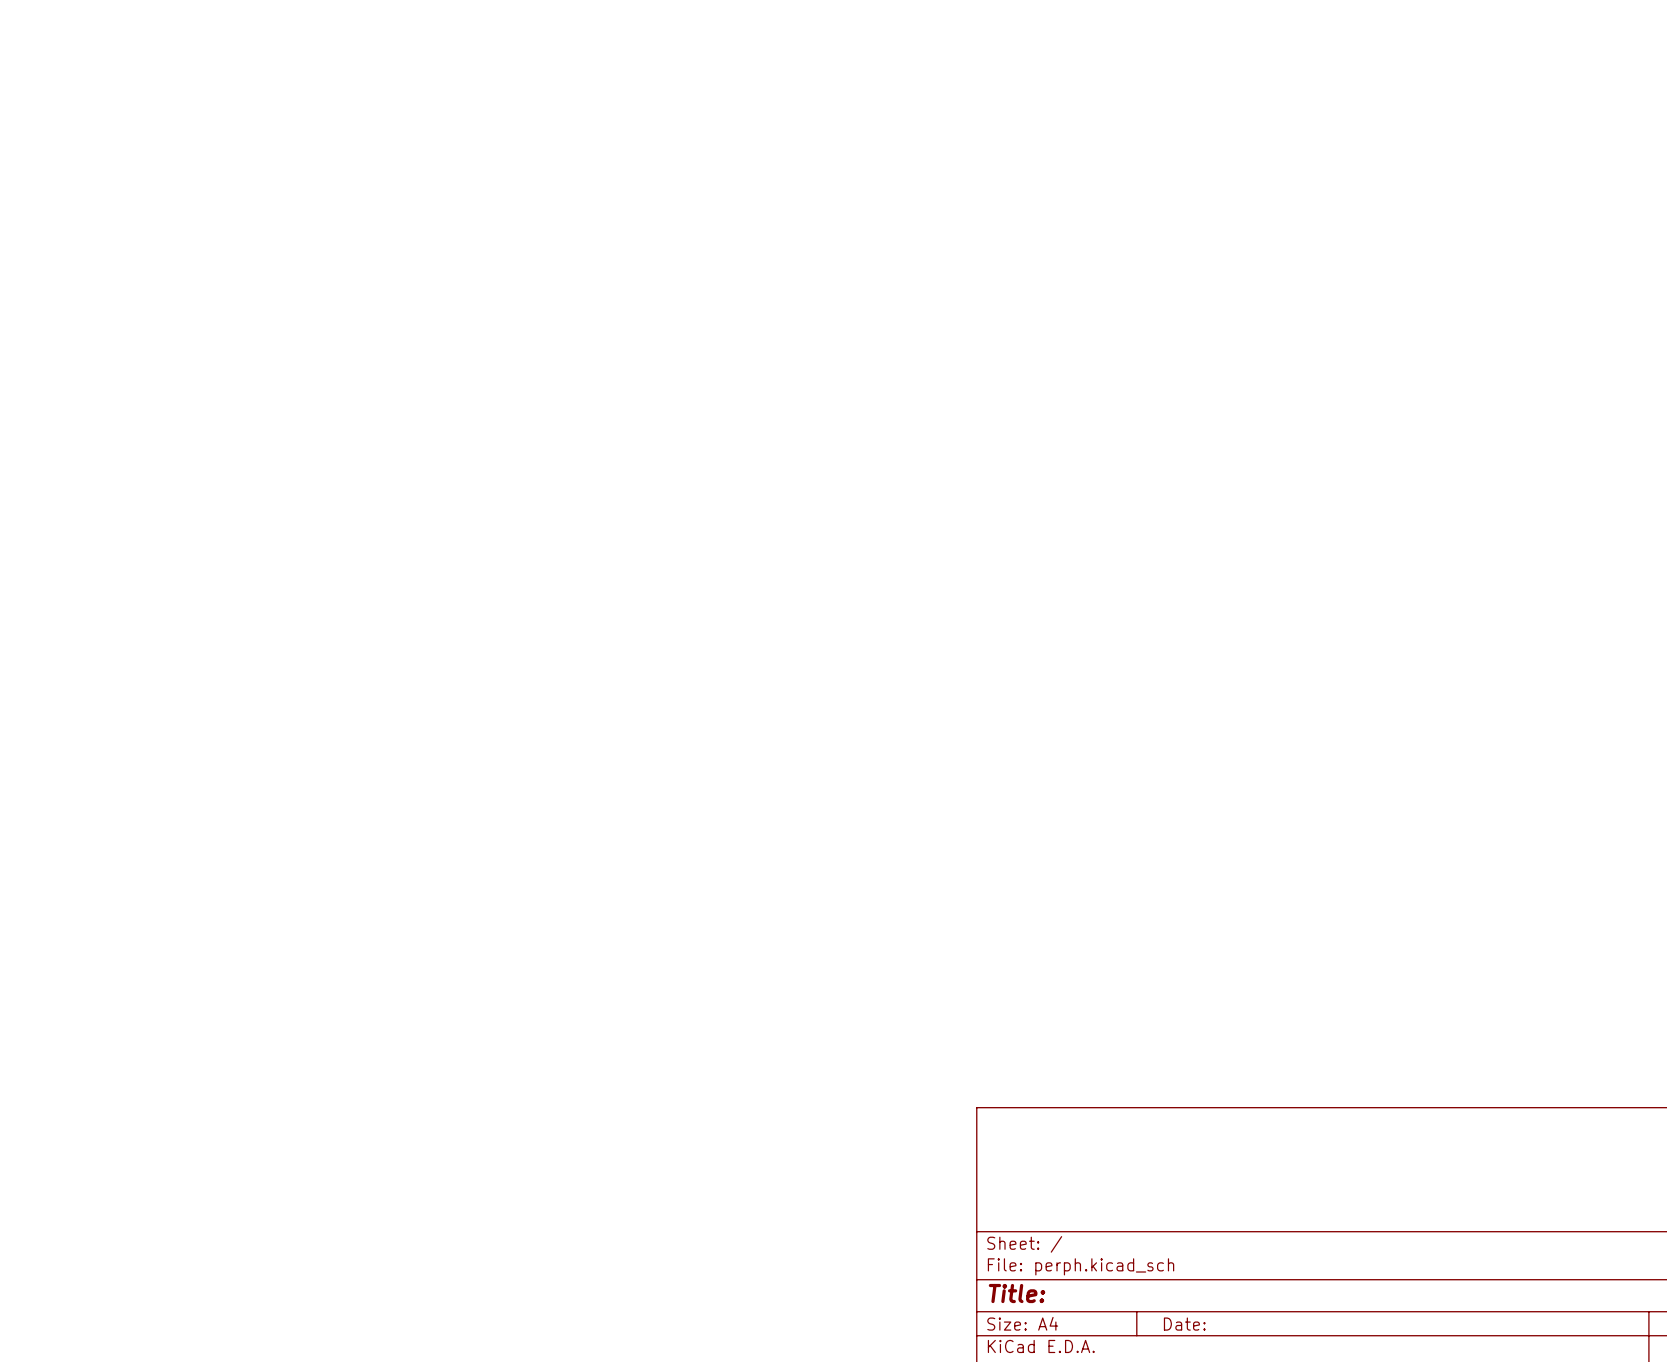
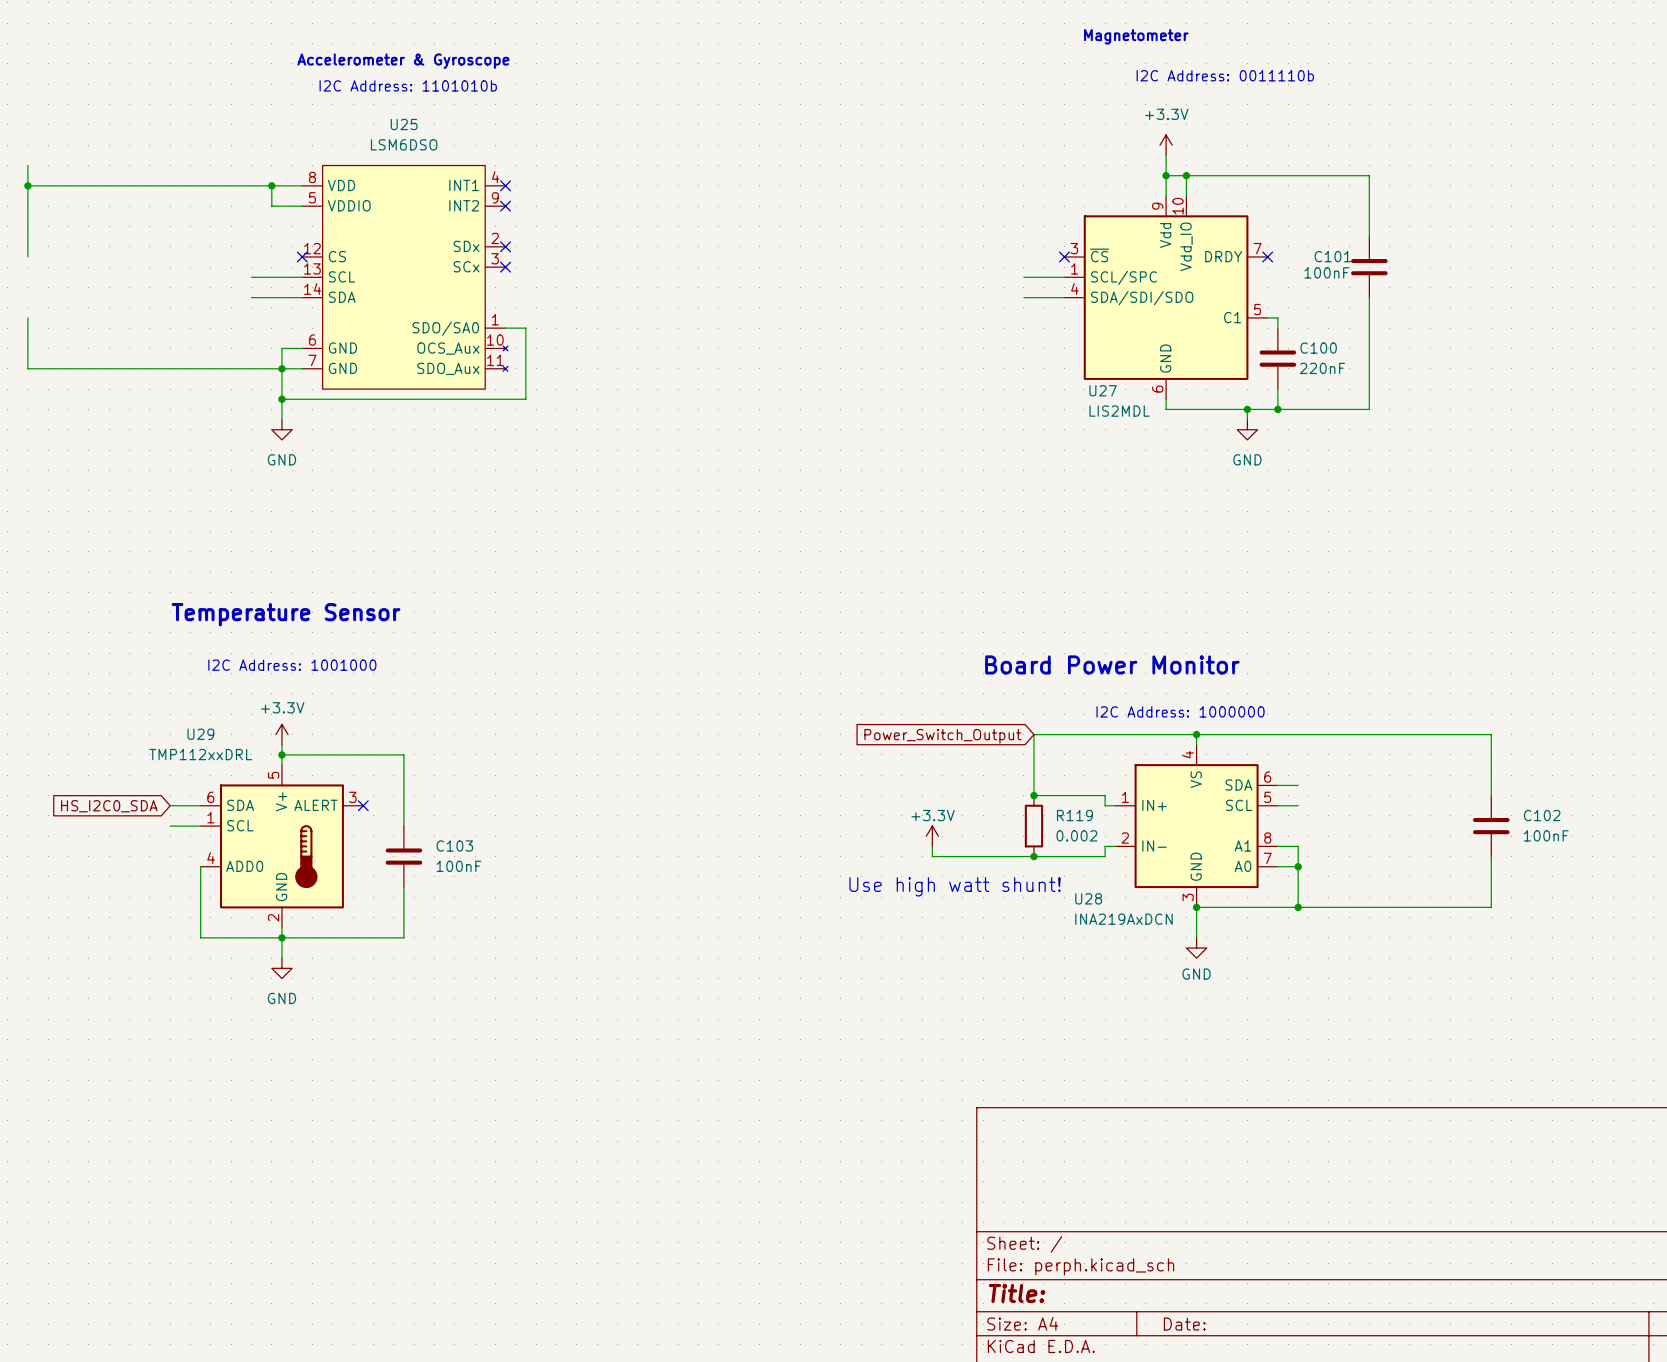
text: none -> Magnetometer (1136, 36)
text: none -> Accelerometer & Gyroscope (403, 61)
text: none -> I2C Address: 0011110b (1225, 75)
text: none -> I2C Address: 1101010b (408, 85)
power symbol: none -> +3.3V (1166, 145)
wire: none -> (1166, 155) (1166, 196)
wire: none -> (27, 165) (27, 256)
wire: none -> (1166, 175) (1369, 175) (1369, 236)
junction: none -> (1166, 175)
wire: none -> (1186, 175) (1186, 196)
junction: none -> (1186, 175)
wire: none -> (27, 185) (302, 185)
junction: none -> (27, 185)
wire: none -> (271, 185) (271, 206) (302, 206)
junction: none -> (271, 185)
no-connect mark: none -> (505, 185)
no-connect mark: none -> (505, 206)
no-connect mark: none -> (505, 246)
no-connect mark: none -> (302, 256)
no-connect mark: none -> (1064, 256)
no-connect mark: none -> (1267, 256)
no-connect mark: none -> (505, 267)
C101: none -> 100nF (1369, 267)
wire: none -> (251, 277) (302, 277)
U25: none -> LSM6DSO (405, 277)
wire: none -> (1023, 277) (1064, 277)
wire: none -> (251, 297) (302, 297)
wire: none -> (1023, 297) (1064, 297)
U27: none -> LIS2MDL (1166, 297)
wire: none -> (1369, 297) (1369, 409) (1166, 409) (1166, 399)
wire: none -> (27, 317) (27, 368) (302, 368)
wire: none -> (1267, 317) (1277, 317) (1277, 328)
wire: none -> (505, 328) (525, 328) (525, 399) (281, 399)
wire: none -> (302, 348) (281, 348) (281, 419)
C100: none -> 220nF (1277, 358)
junction: none -> (281, 368)
wire: none -> (1277, 389) (1277, 409)
junction: none -> (281, 399)
wire: none -> (1247, 409) (1247, 419)
junction: none -> (1247, 409)
junction: none -> (1277, 409)
power symbol: none -> GND (281, 429)
power symbol: none -> GND (1247, 429)
text: none -> Temperature Sensor (286, 614)
text: none -> Board Power Monitor (1112, 664)
text: none -> I2C Address: 1001000 (292, 665)
text: none -> I2C Address: 1000000 (1180, 711)
power symbol: none -> +3.3V (281, 734)
wire: none -> (1196, 734) (1196, 744)
junction: none -> (1196, 734)
global label: none -> Power_Switch_Output (942, 736)
wire: none -> (281, 744) (281, 765)
wire: none -> (281, 754) (403, 754) (403, 826)
junction: none -> (281, 754)
wire: none -> (1277, 785) (1298, 785)
junction: none -> (1033, 795)
wire: none -> (1491, 795) (1491, 734) (1033, 734) (1033, 795) (1105, 795) (1105, 805) (1115, 805)
wire: none -> (170, 805) (200, 805)
no-connect mark: none -> (363, 805)
wire: none -> (1277, 805) (1298, 805)
global label: none -> HS_I2C0_SDA (109, 806)
wire: none -> (170, 826) (200, 826)
R119: none -> 0.002 (1033, 826)
U28: none -> INA219AxDCN (1196, 826)
C102: none -> 100nF (1491, 826)
power symbol: none -> +3.3V (932, 836)
U29: none -> TMP112xxDRL (281, 846)
wire: none -> (932, 846) (932, 856) (1105, 856) (1105, 846) (1115, 846)
wire: none -> (1277, 846) (1298, 846) (1298, 907)
C103: none -> 100nF (403, 856)
junction: none -> (1033, 856)
wire: none -> (1491, 856) (1491, 907) (1196, 907) (1196, 937)
wire: none -> (200, 866) (200, 937) (403, 937) (403, 887)
wire: none -> (1277, 866) (1298, 866)
junction: none -> (1298, 866)
text: none -> Use high watt shunt! (955, 886)
junction: none -> (1196, 907)
junction: none -> (1298, 907)
wire: none -> (281, 927) (281, 958)
junction: none -> (281, 937)
power symbol: none -> GND (1196, 948)
power symbol: none -> GND (281, 968)

